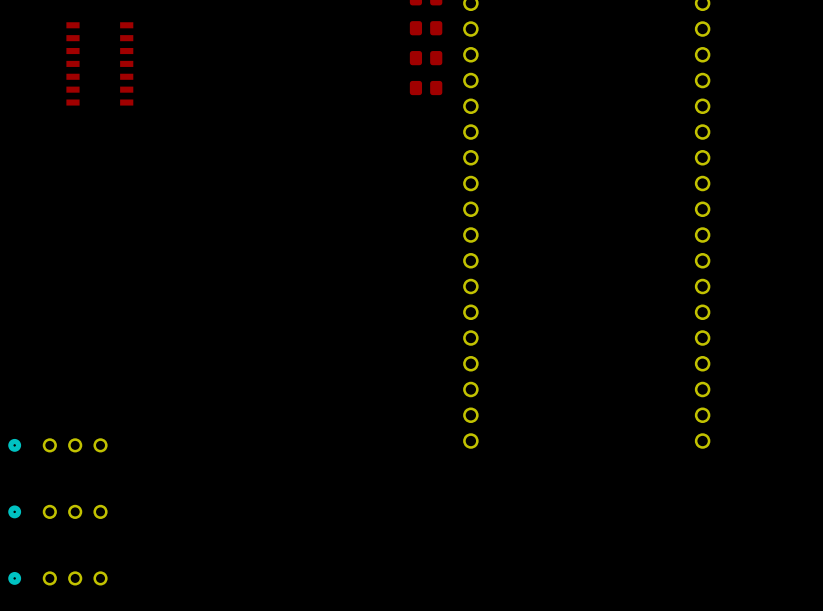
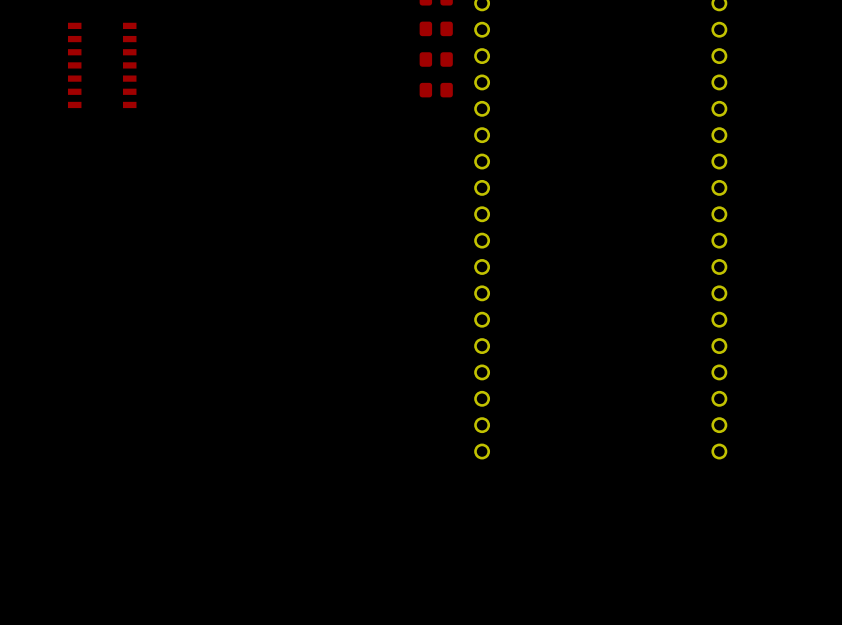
part: (57, 445) -> none
part: (57, 511) -> none
part: (57, 578) -> none

